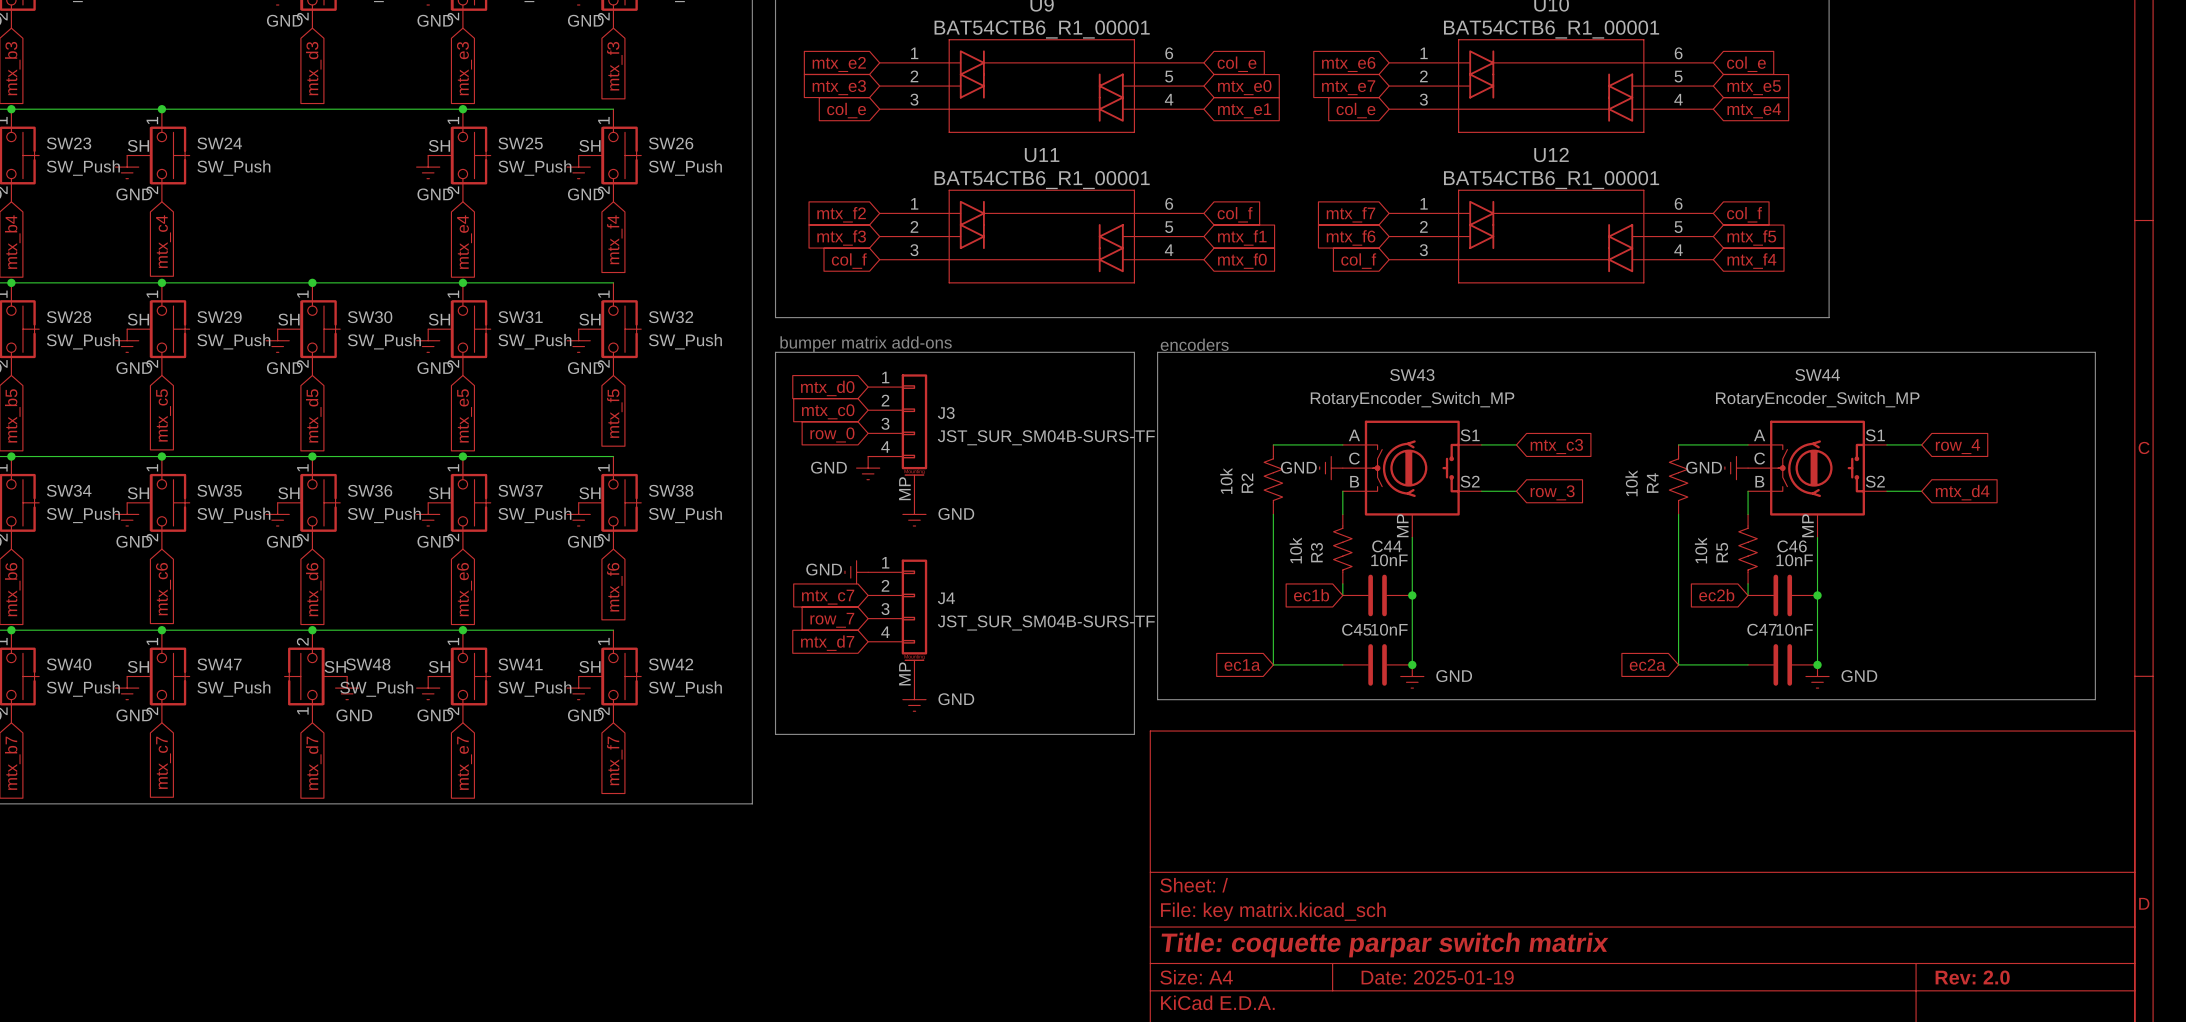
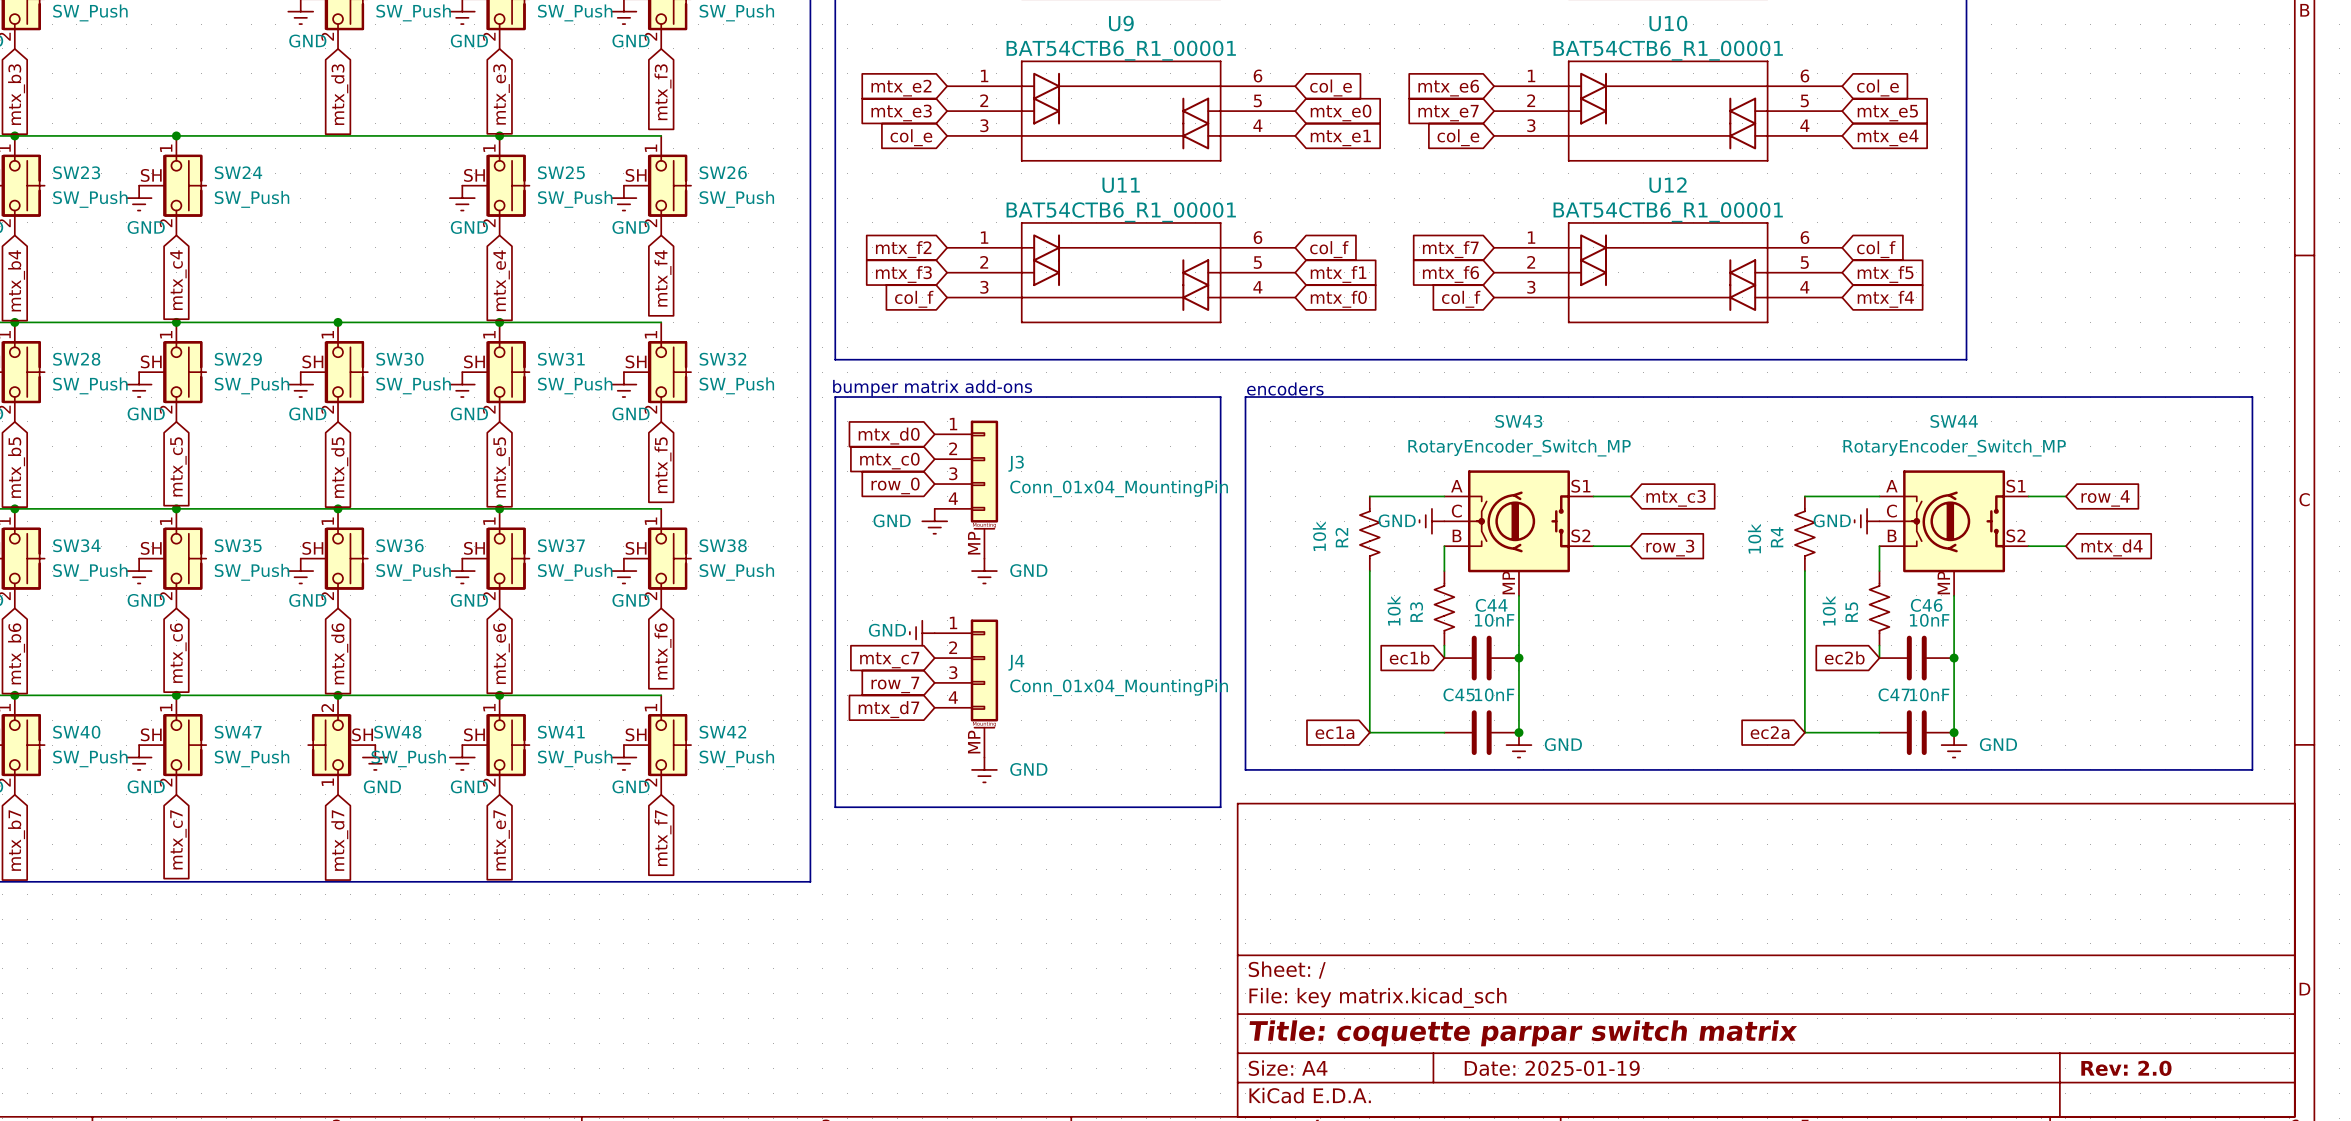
J3 value: JST_SUR_SM04B-SURS-TF (1046, 437) -> Conn_01x04_MountingPin (1119, 488)
J4 value: JST_SUR_SM04B-SURS-TF (1046, 623) -> Conn_01x04_MountingPin (1119, 687)

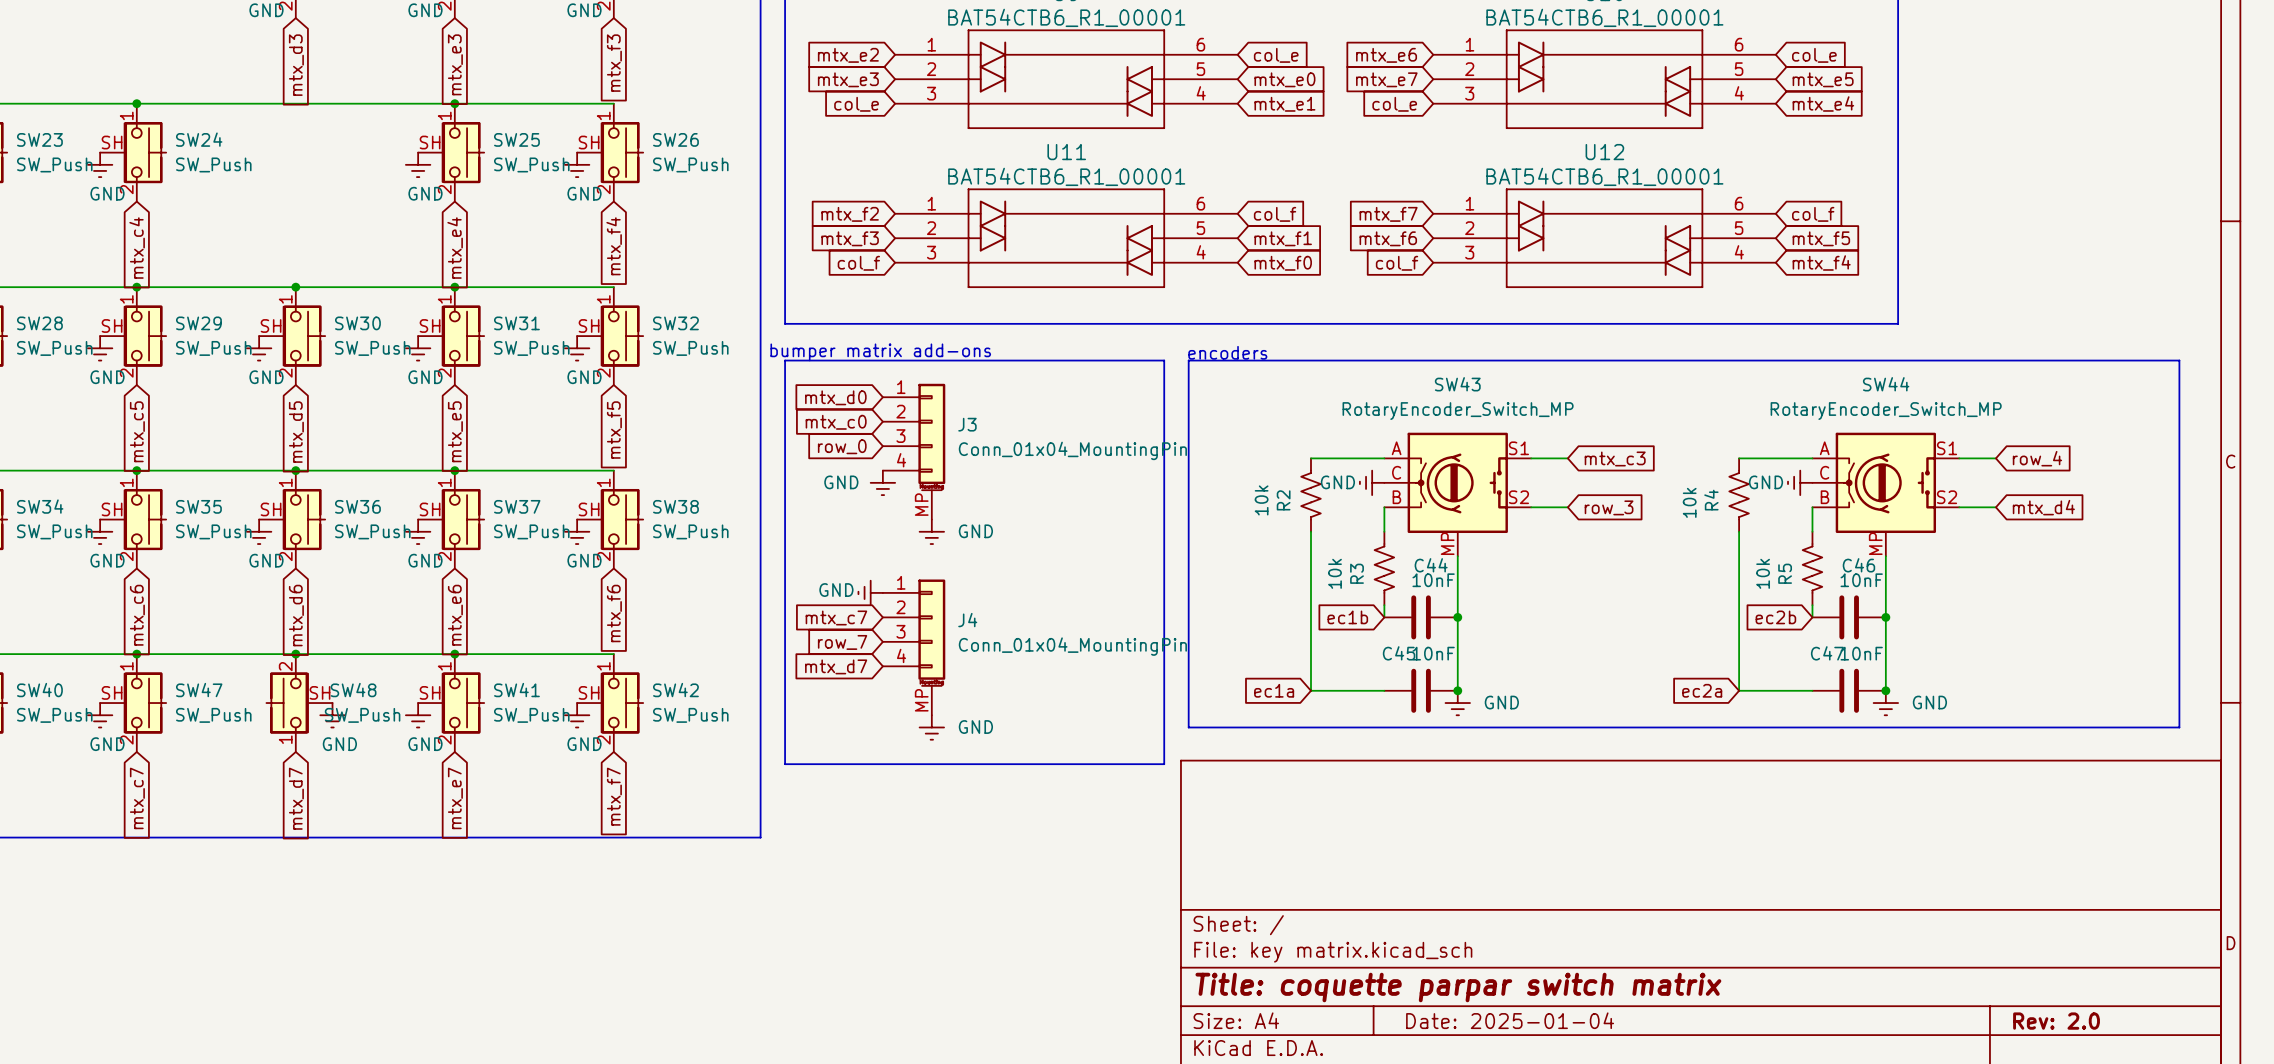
title block: Date: 2025-01-19 (1552, 1068) -> Date: 2025-01-04 (1510, 1020)

